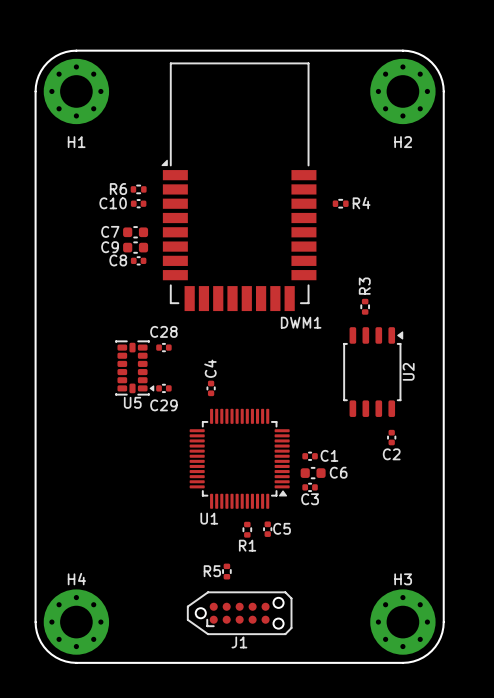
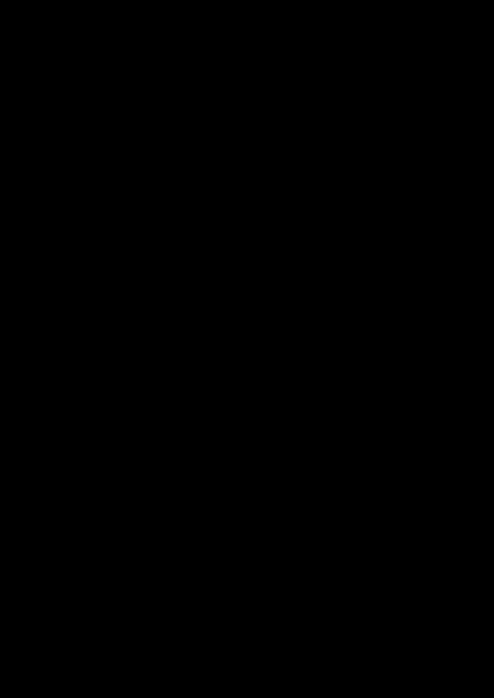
board edge: (76, 50) (402, 50) (423, 56) (438, 71) (443, 91) (443, 622) (438, 642) (423, 657) (402, 662) (76, 662) (55, 657) (41, 642) (35, 622) (35, 91) (38, 75) (47, 62) (60, 53) (76, 50) -> none
H1: (76, 91) -> none
H2: (402, 91) -> none
DWM1: (238, 186) -> none
R6: (138, 189) -> none
C10: (138, 203) -> none
R4: (340, 203) -> none
C7: (135, 232) -> none
C9: (135, 247) -> none
C8: (138, 260) -> none
R3: (365, 306) -> none
C28: (163, 347) -> none
U5: (134, 367) -> none
U2: (373, 372) -> none
C29: (163, 388) -> none
C4: (211, 388) -> none
C2: (391, 437) -> none
C1: (310, 456) -> none
U1: (239, 458) -> none
C6: (313, 473) -> none
C3: (310, 487) -> none
R1: (247, 529) -> none
C5: (267, 529) -> none
R5: (226, 571) -> none
J1: (239, 613) -> none
H4: (76, 622) -> none
H3: (402, 622) -> none

